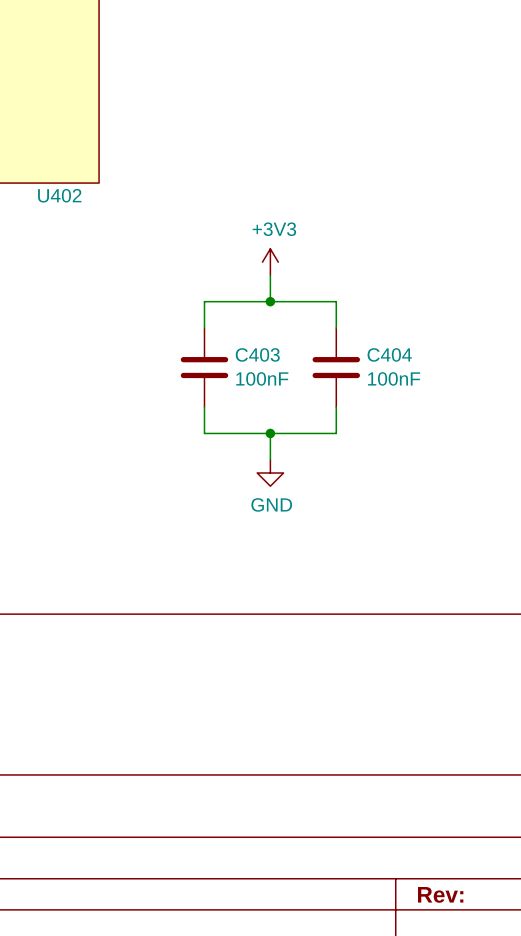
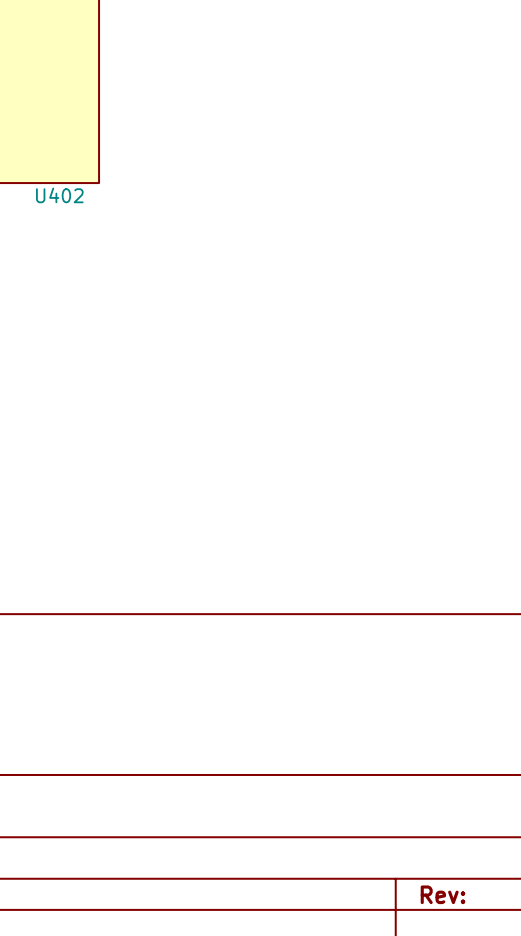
power symbol: +3V3 (270, 262) -> none
wire: (270, 275) (270, 301) -> none
junction: (270, 301) -> none
wire: (204, 328) (204, 301) (336, 301) (336, 328) -> none
C403: 100nF (204, 367) -> none
C404: 100nF (336, 367) -> none
wire: (204, 407) (204, 433) (336, 433) (336, 407) -> none
wire: (270, 433) (270, 459) -> none
junction: (270, 433) -> none
power symbol: GND (270, 473) -> none

